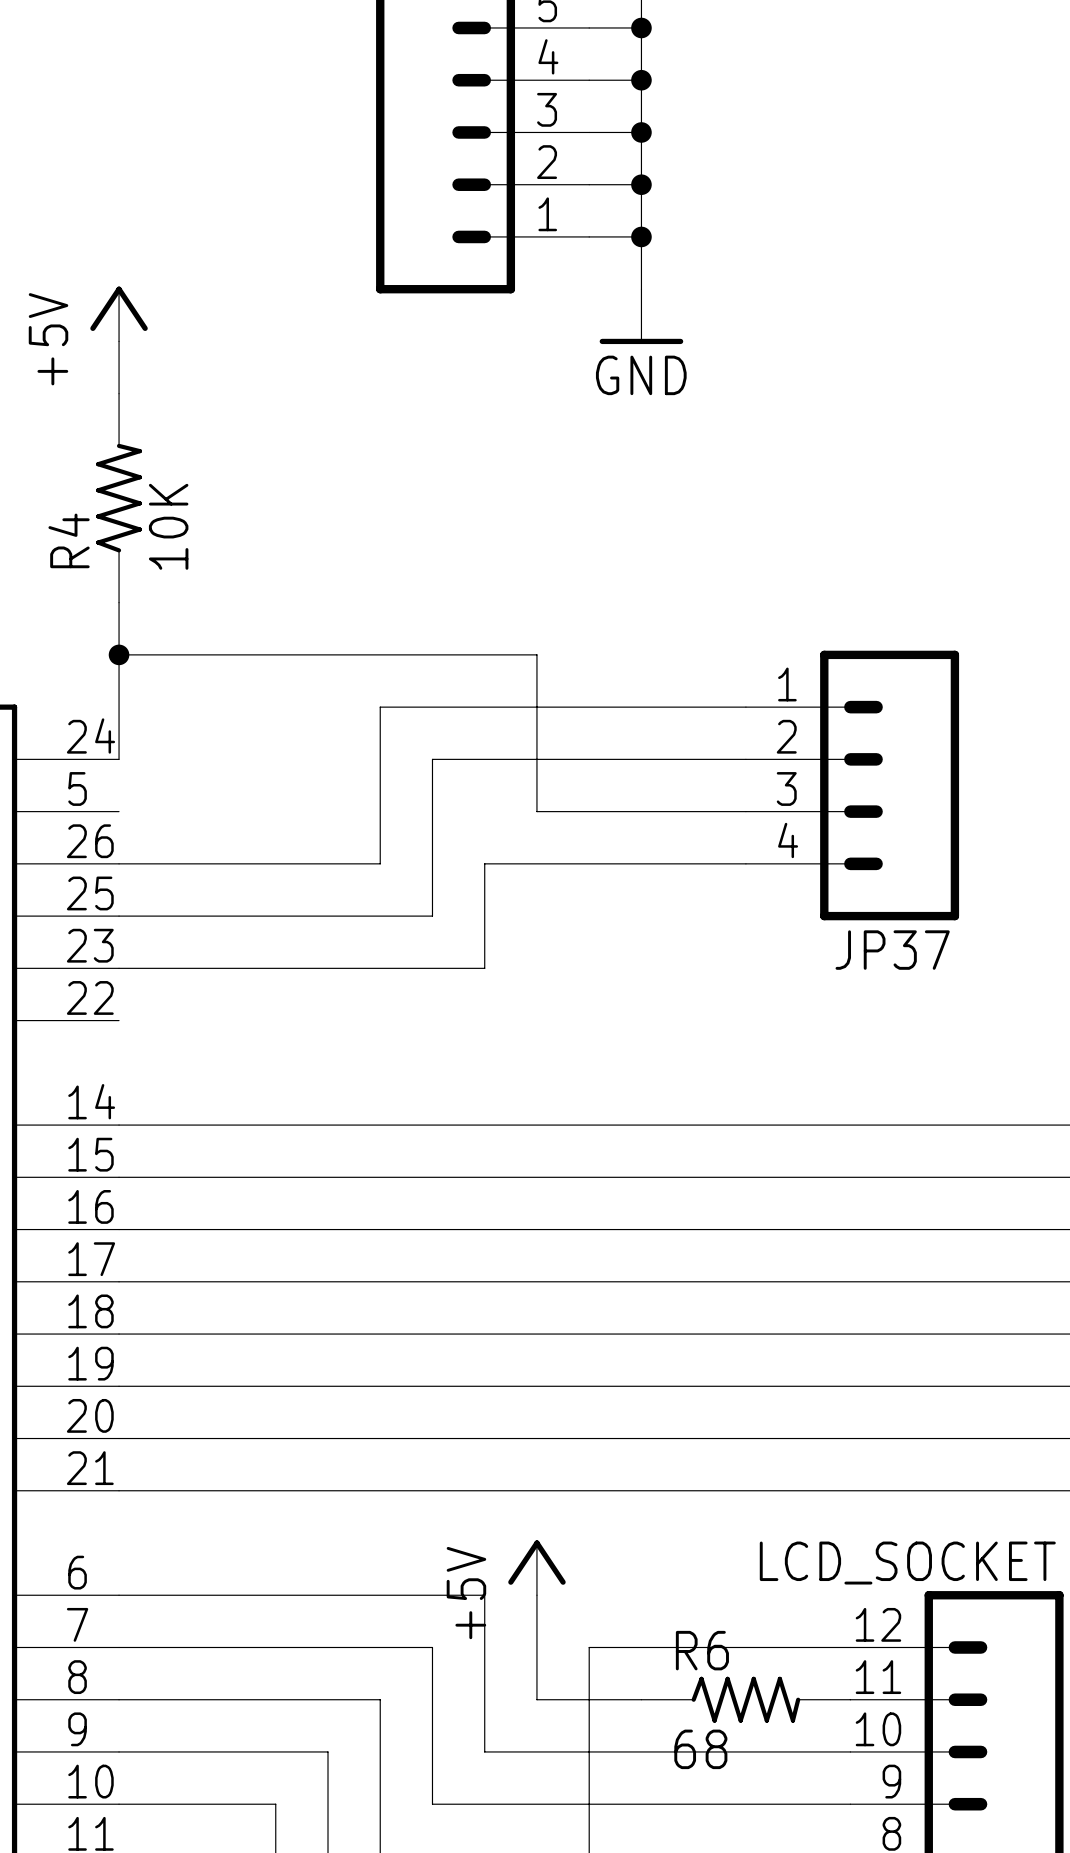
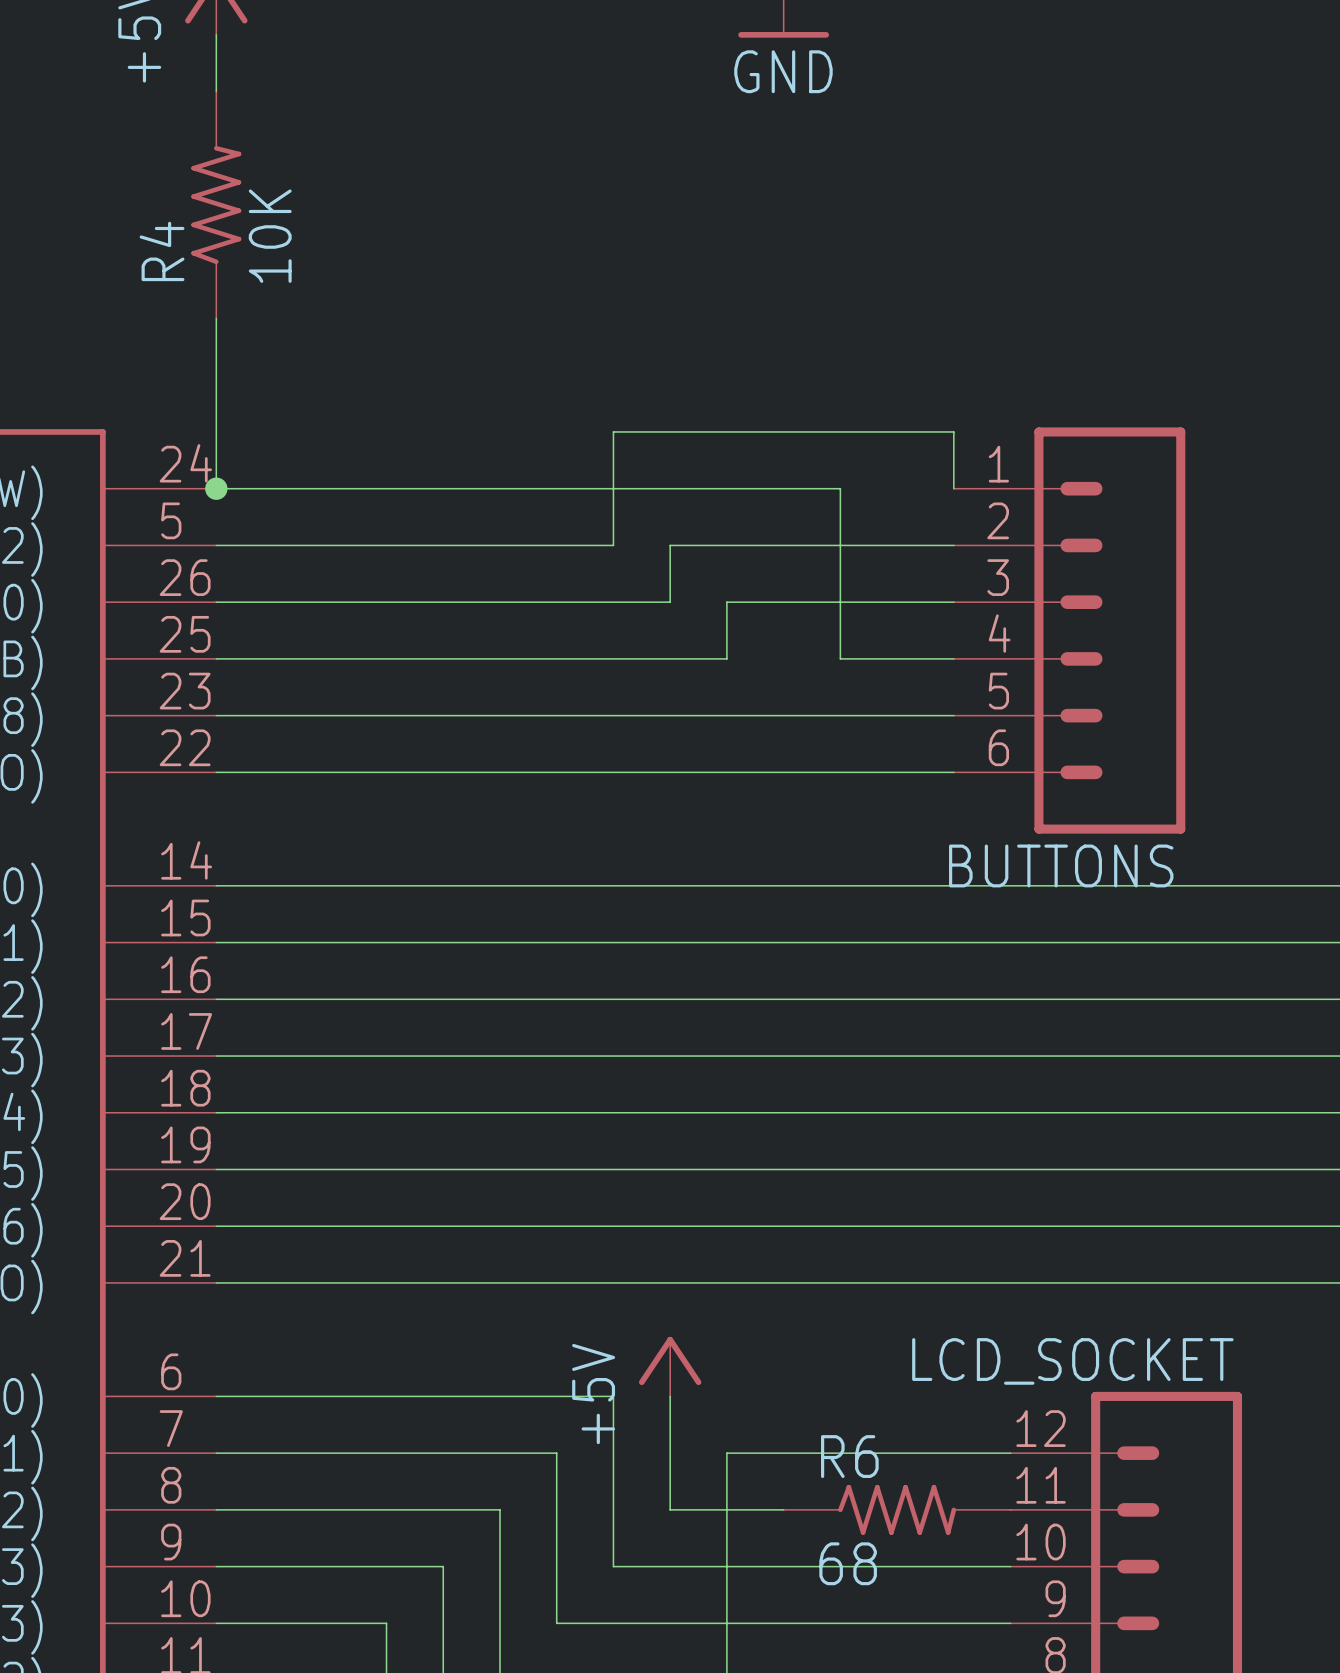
wire: (119, 654) (536, 654) (536, 811) -> none
junction position: (119, 654) -> (216, 488)
wire: (484, 707) (380, 707) (380, 863) -> (613, 431) (613, 545) (216, 545)
wire: none -> (897, 431) (953, 431) (953, 488)
wire: none -> (216, 488) (556, 488)
wire: (432, 759) (432, 916) -> (726, 602) (726, 658) (556, 658)
wire: (693, 759) (745, 759) -> (840, 488) (840, 658) (953, 658)
JP37: (852, 785) -> none
wire: (484, 863) (484, 968) -> (613, 602) (499, 602)
wire: (536, 863) (589, 863) -> (670, 602) (670, 545)
BUTTONS: none -> (1069, 630)
wire: none -> (613, 715) (953, 715)
wire: none -> (216, 772) (953, 772)

